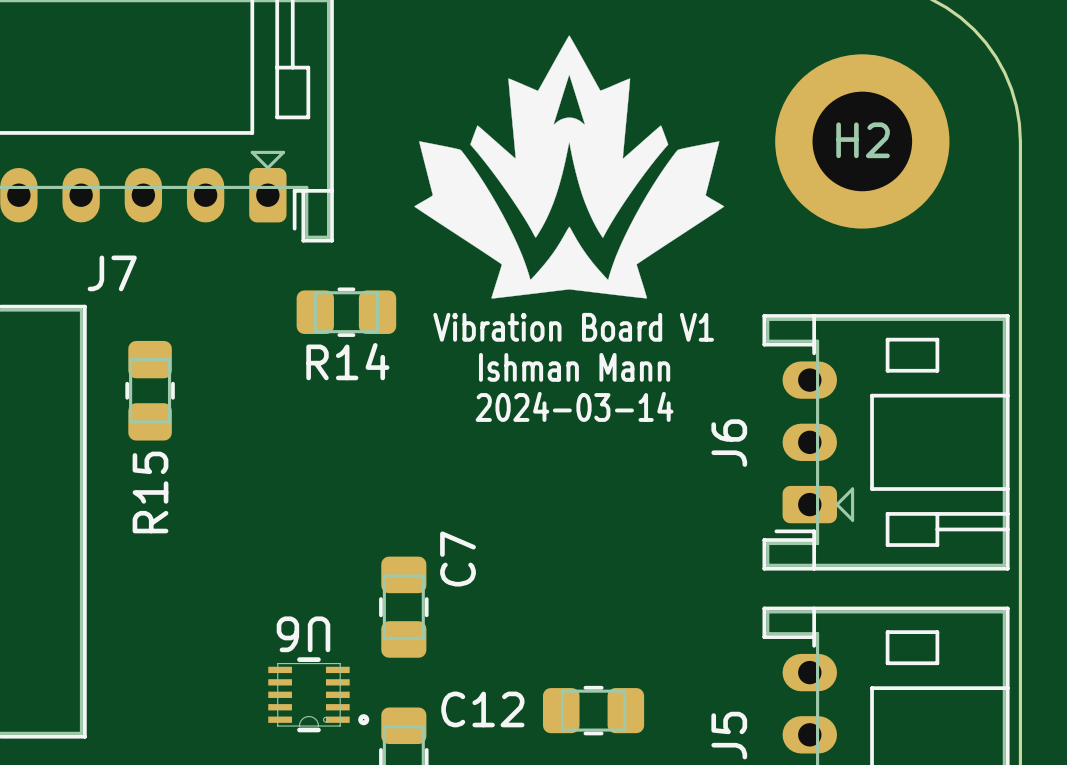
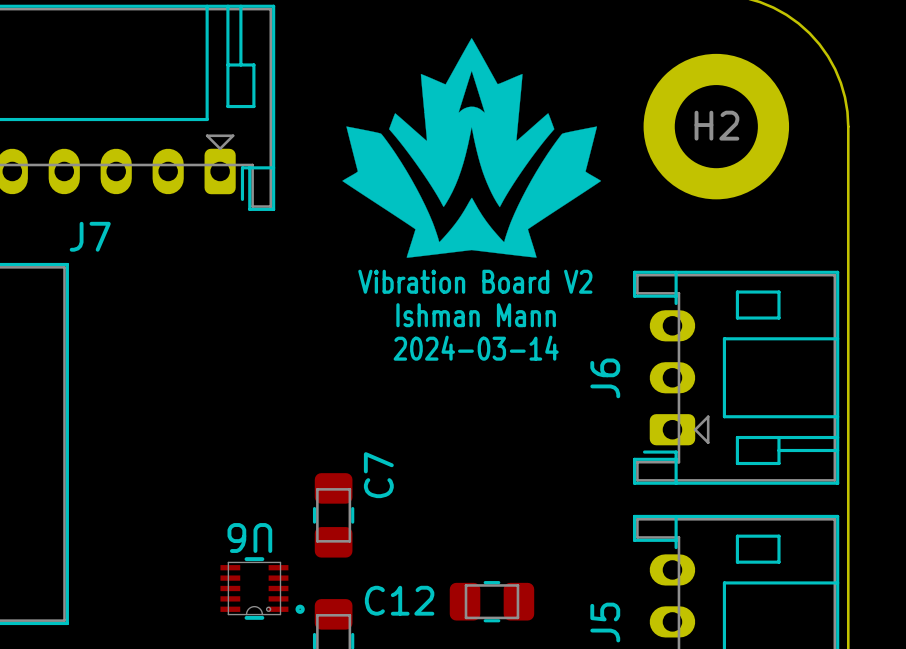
R14: (346, 312) -> none
text: Vibration Board V1 (573, 327) -> Vibration Board V2 (475, 281)
R15: (150, 390) -> none

